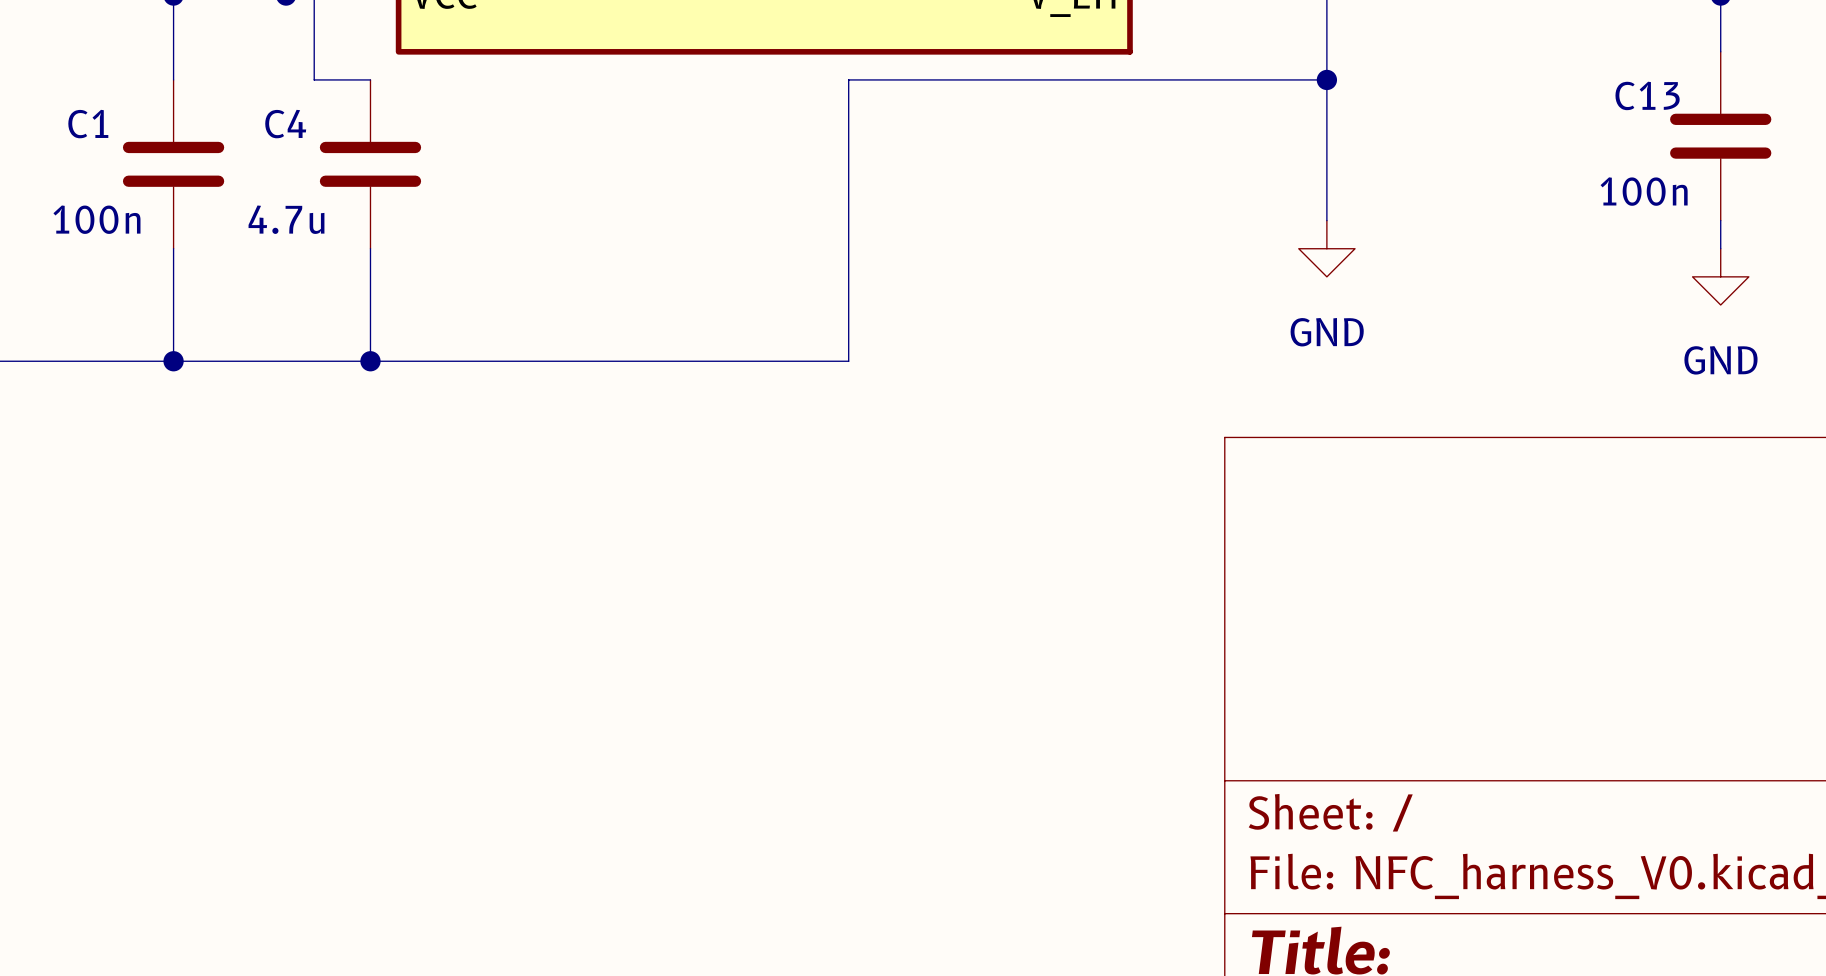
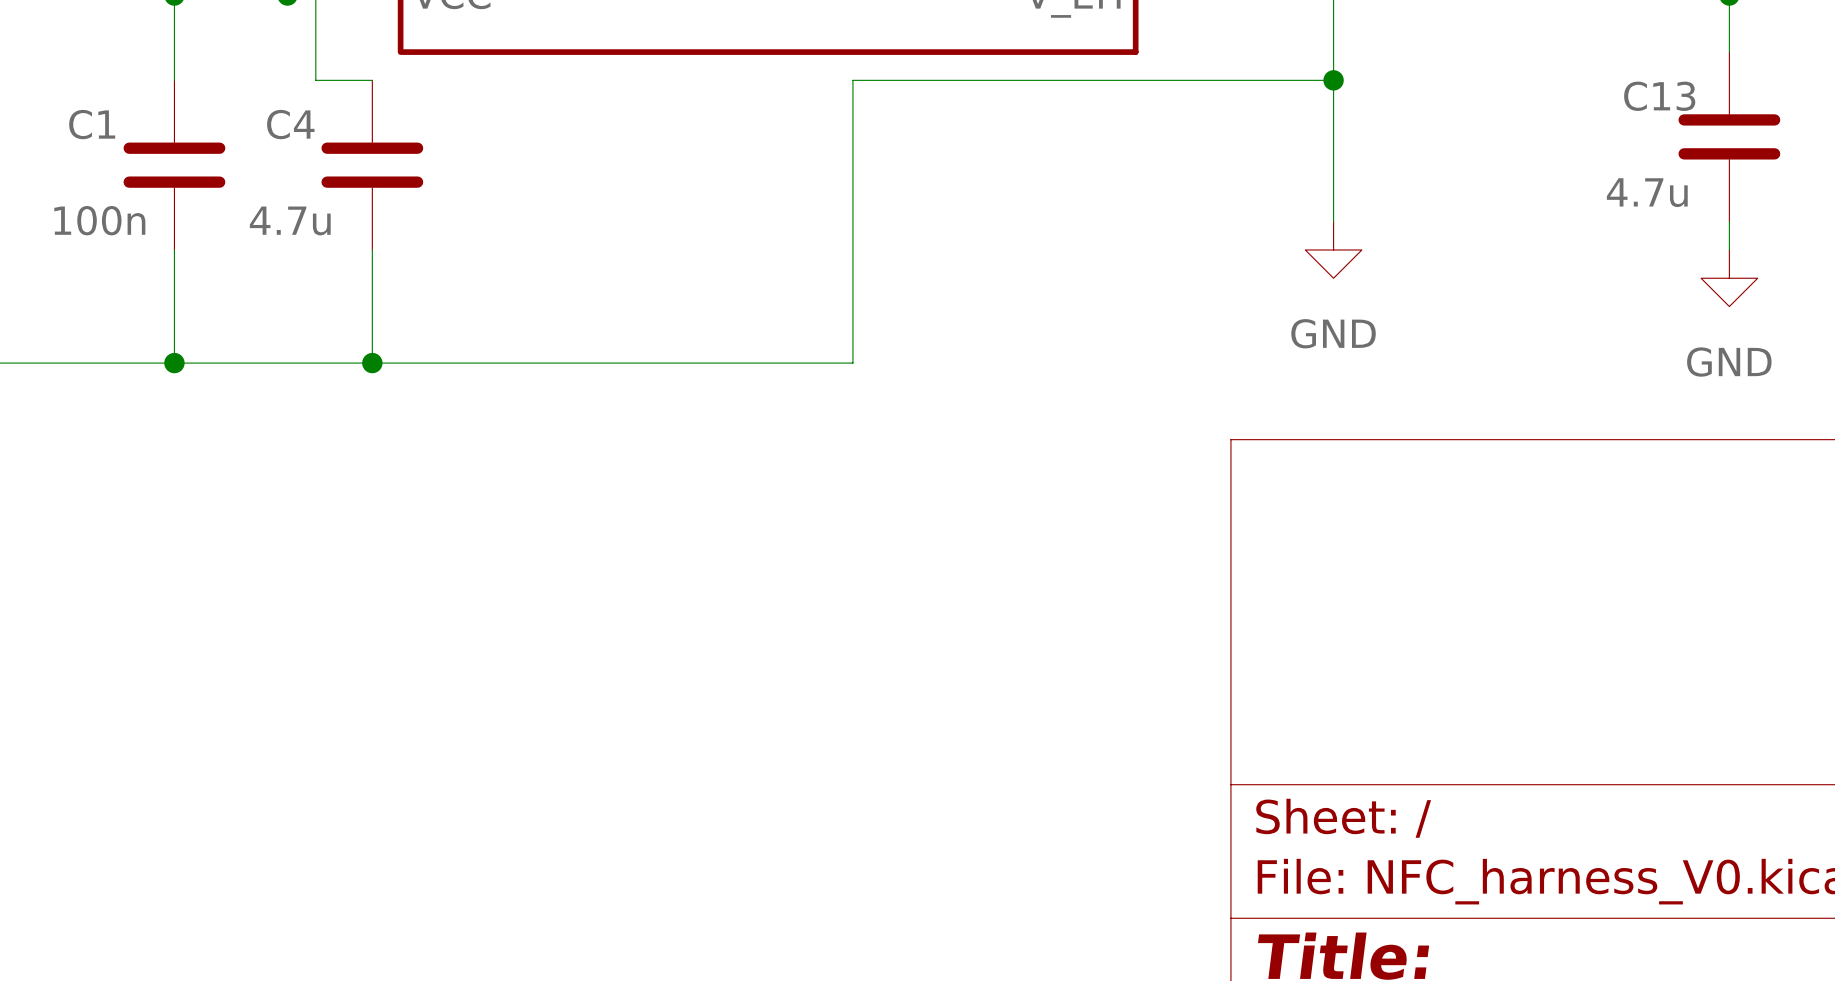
C13 value: 100n (1644, 191) -> 4.7u (1647, 192)

